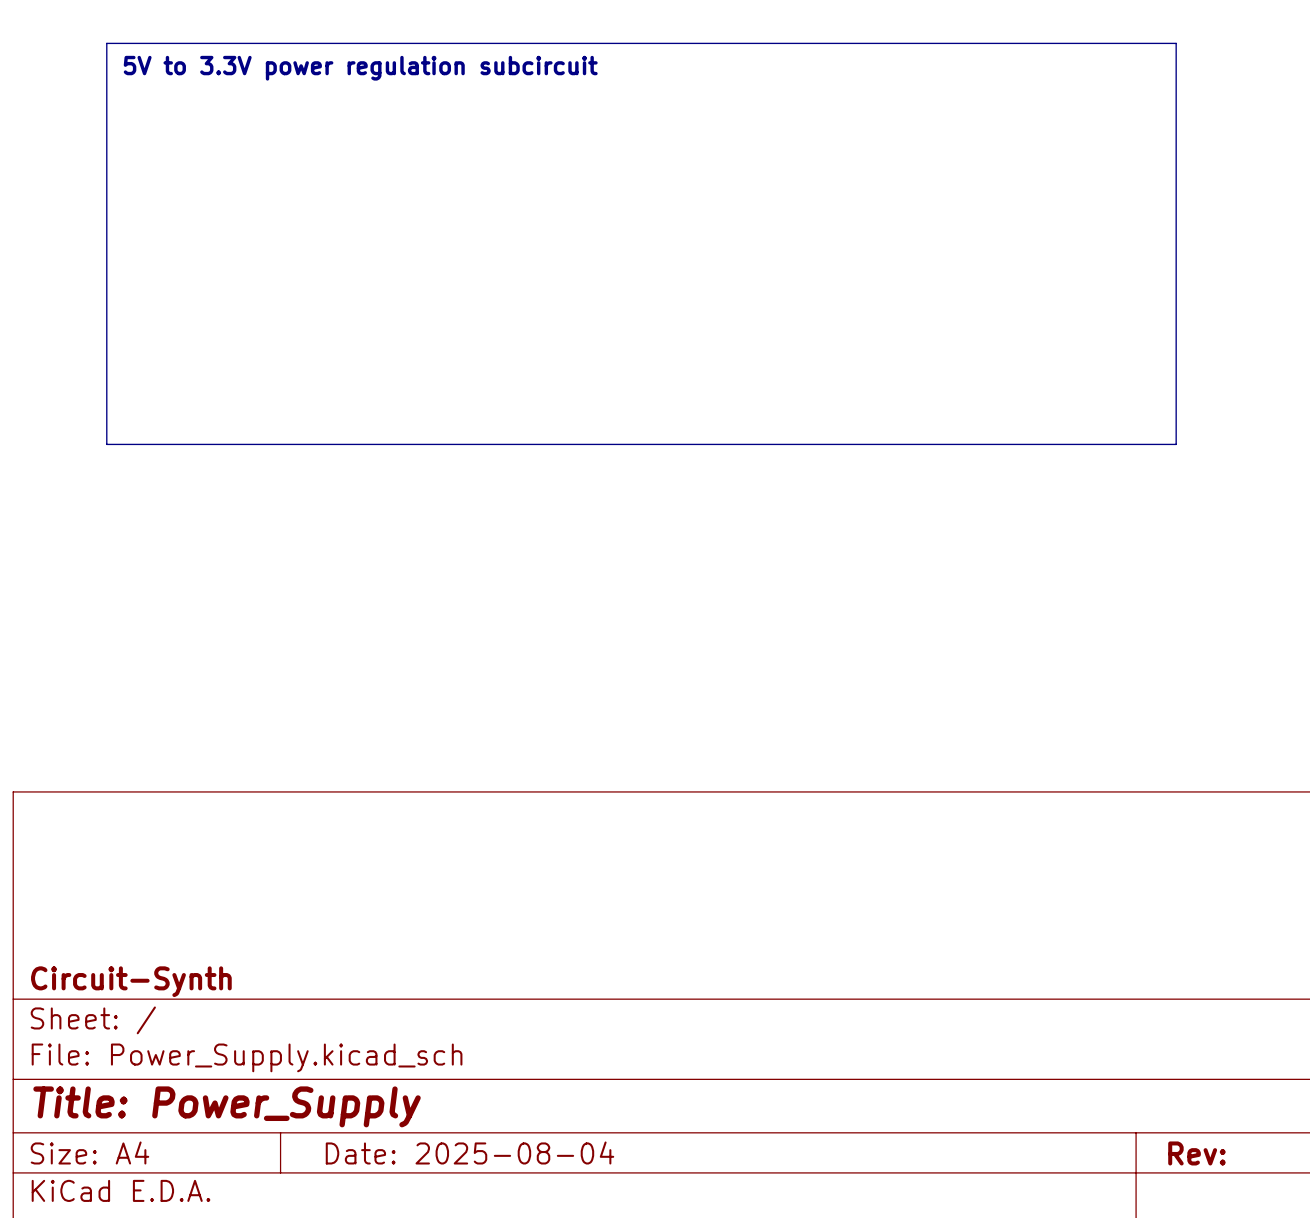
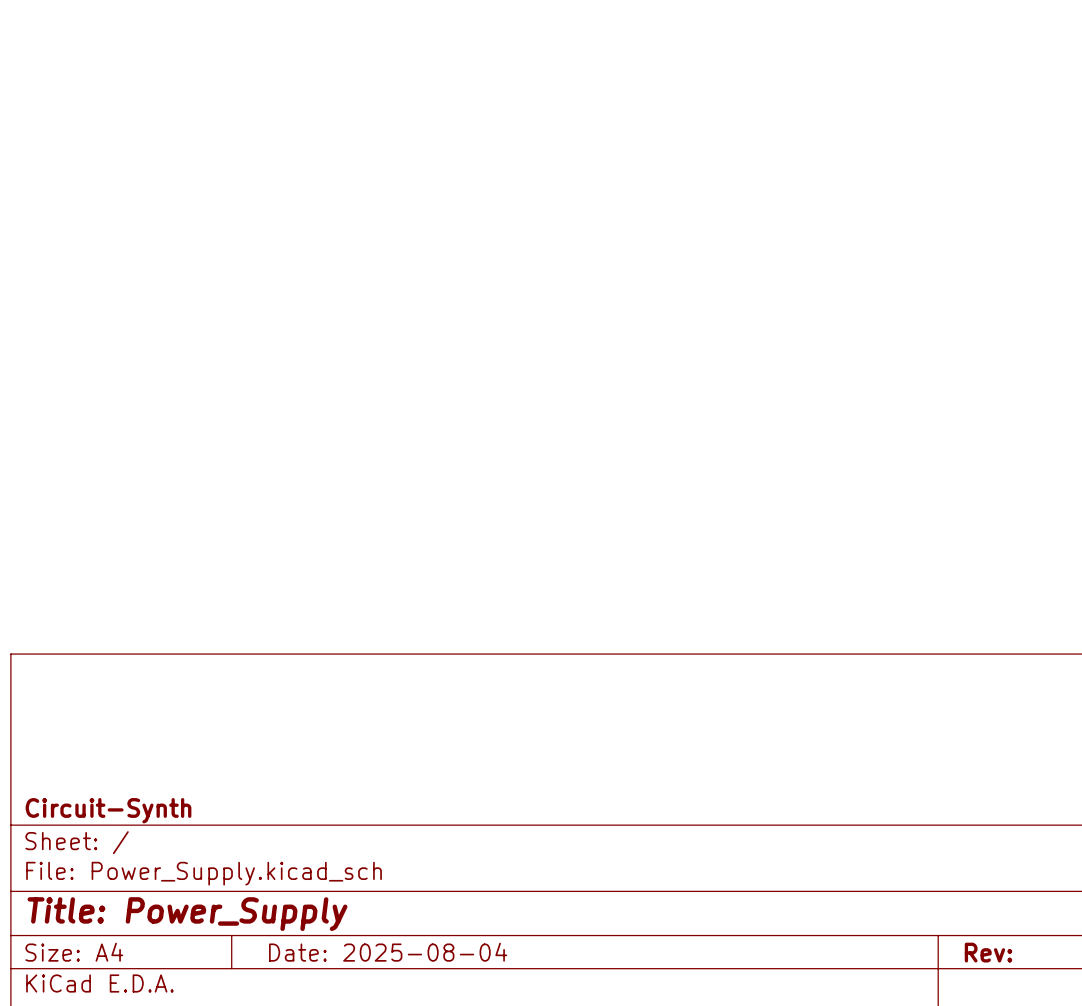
line: (106, 43) (1176, 43) (1176, 444) (106, 444) (106, 43) -> none
text: 5V to 3.3V power regulation subcircuit (360, 68) -> none

